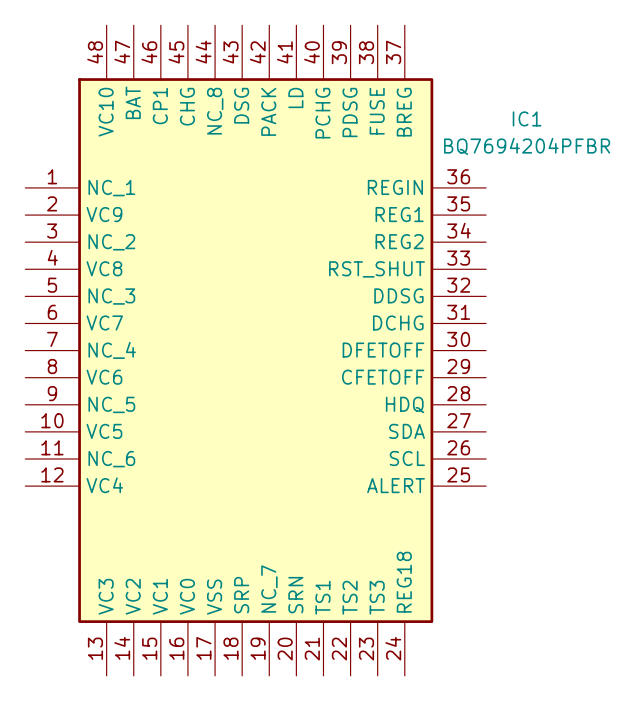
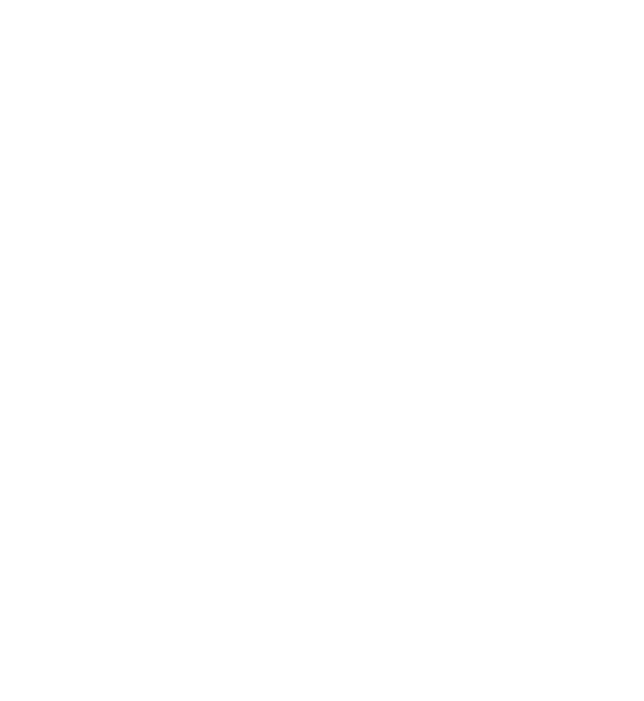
IC1: BQ7694204PFBR (255, 350) -> none

